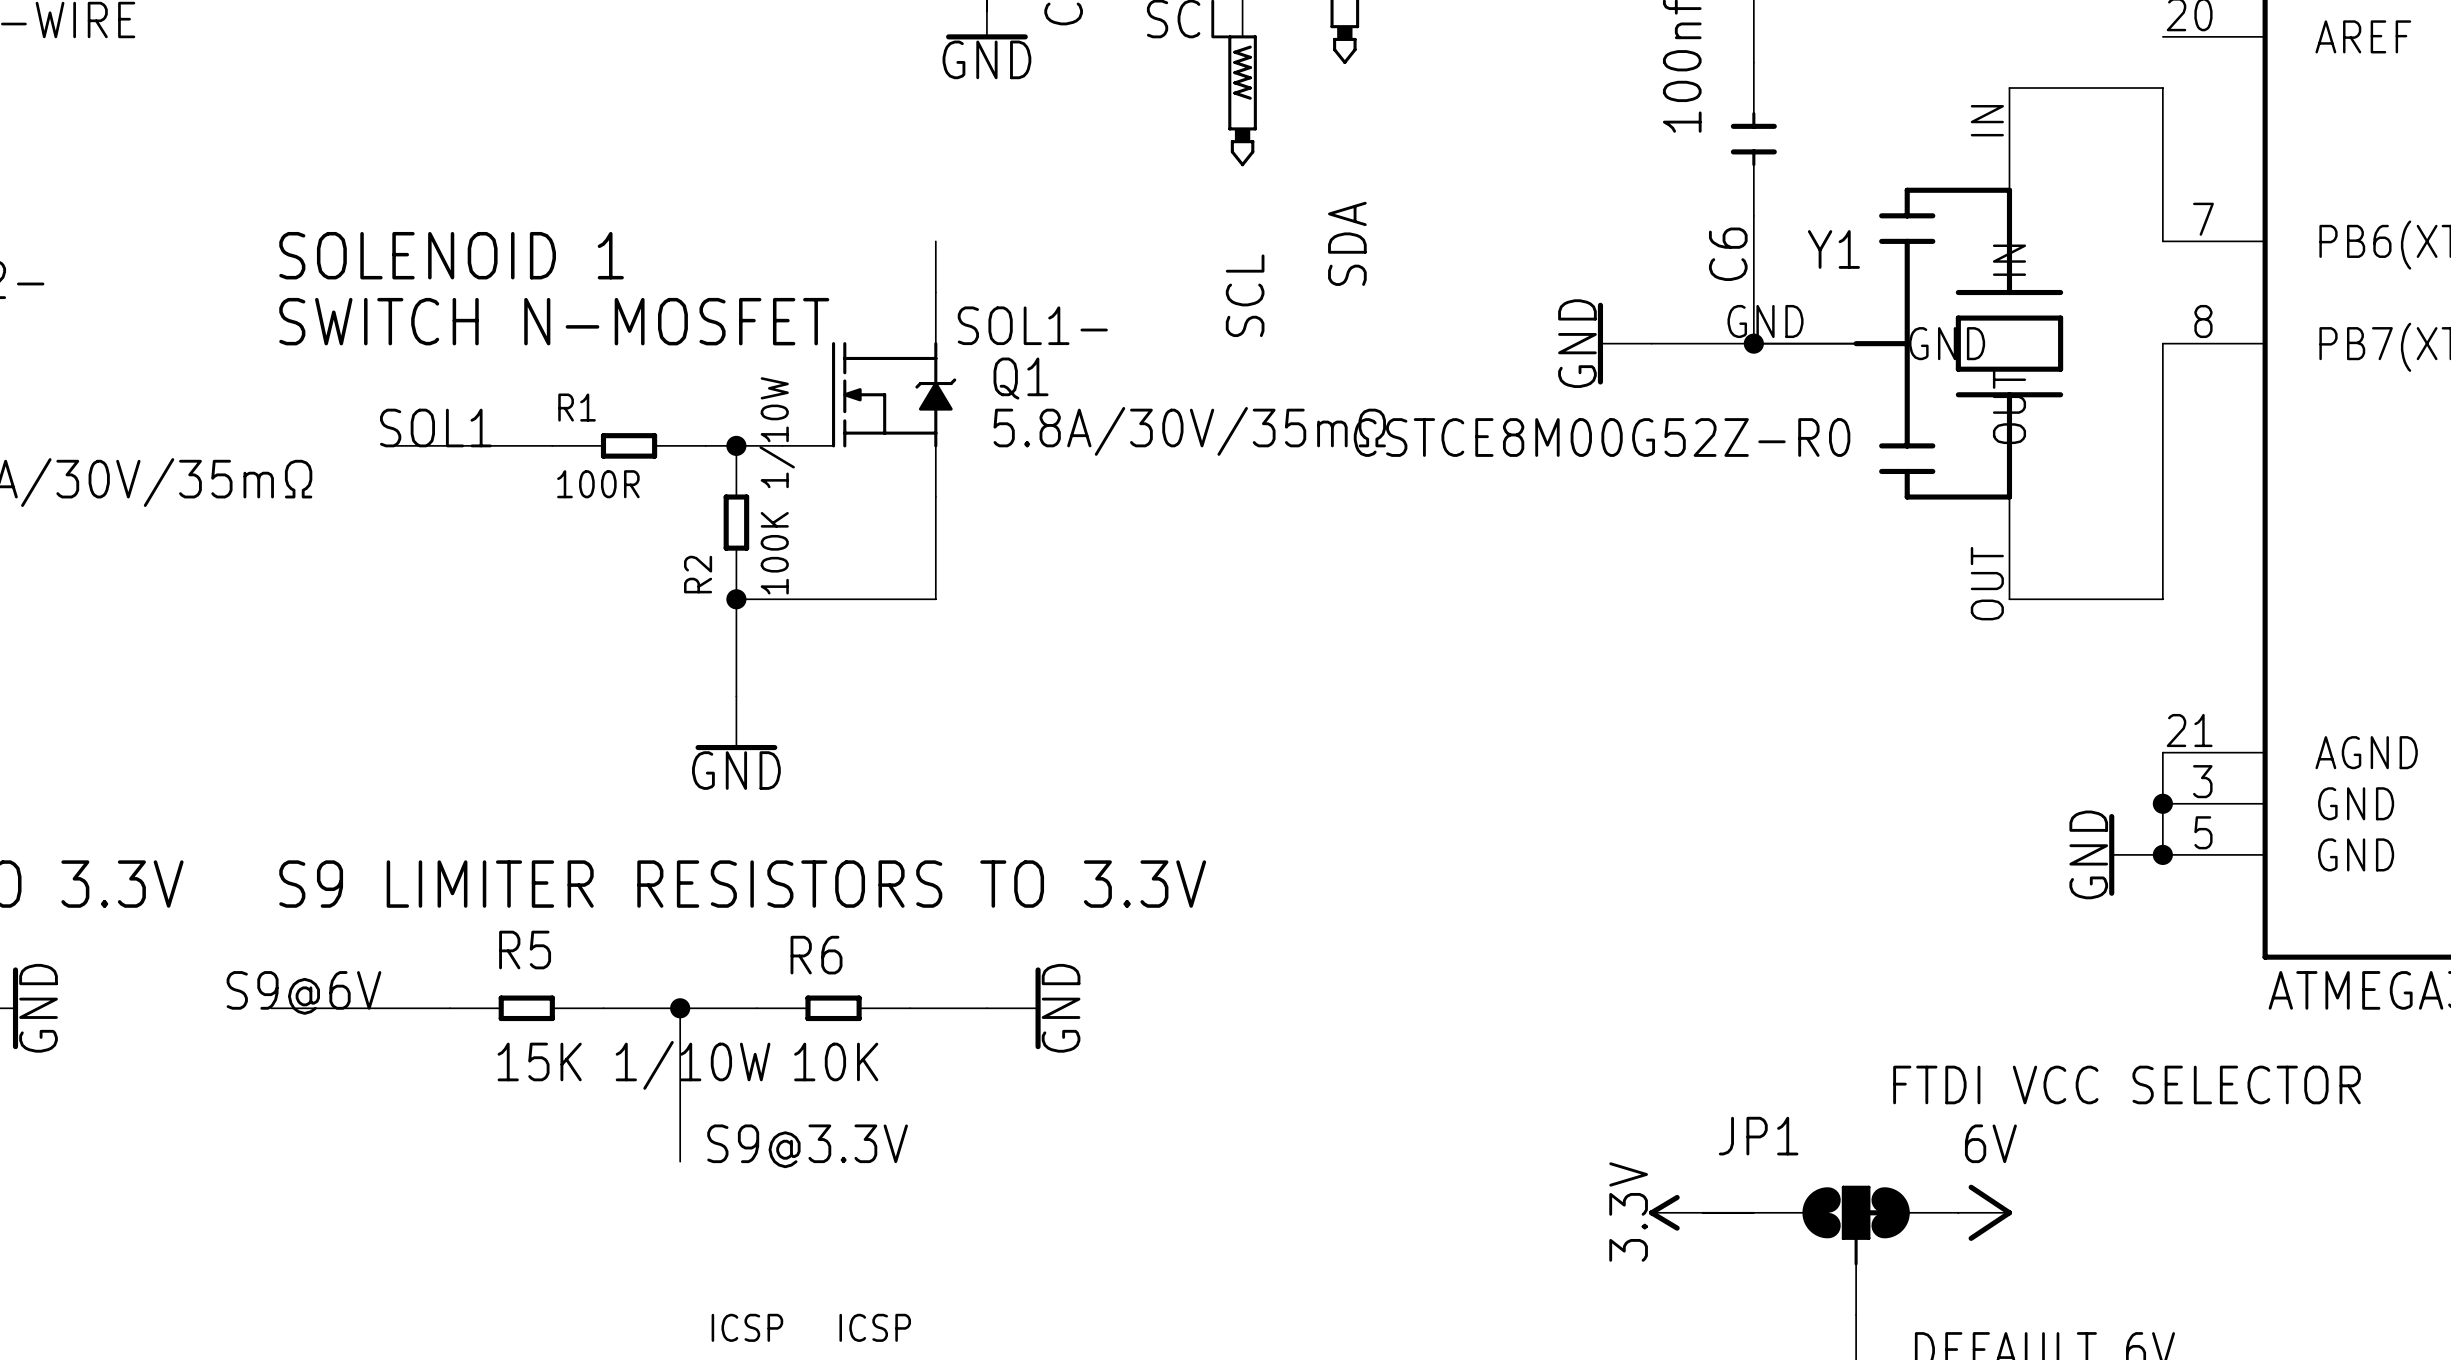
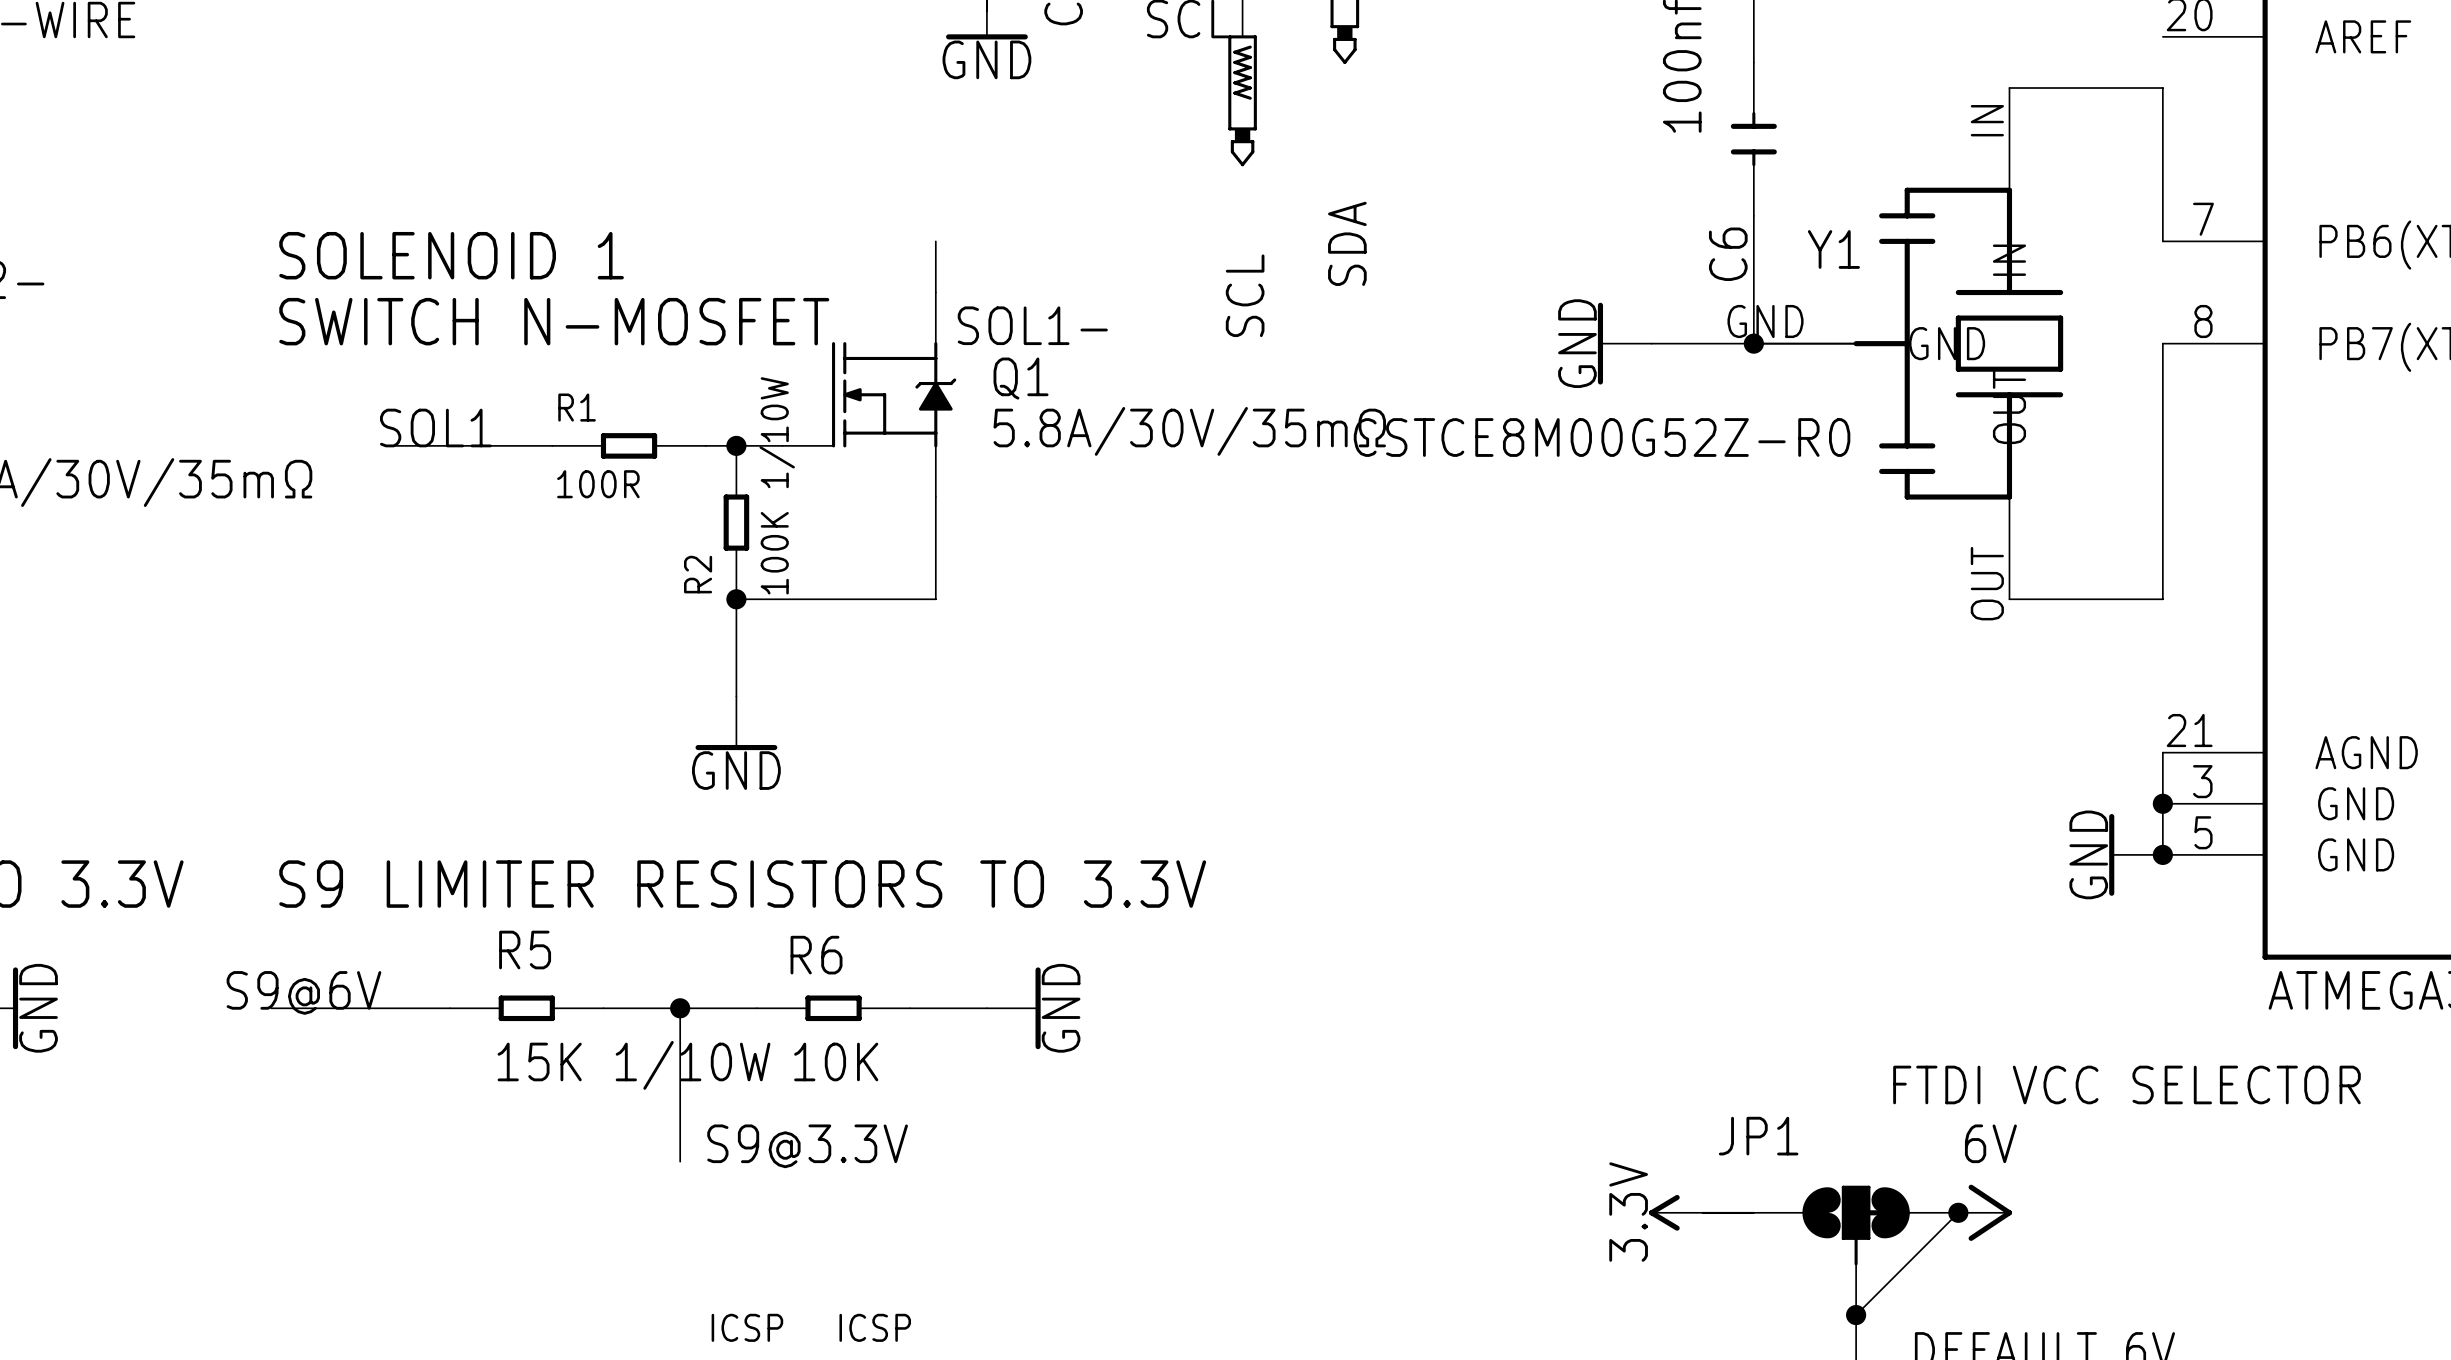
wire: none -> (1958, 1212) (1856, 1315)
junction: none -> (1958, 1212)
junction: none -> (1856, 1315)

